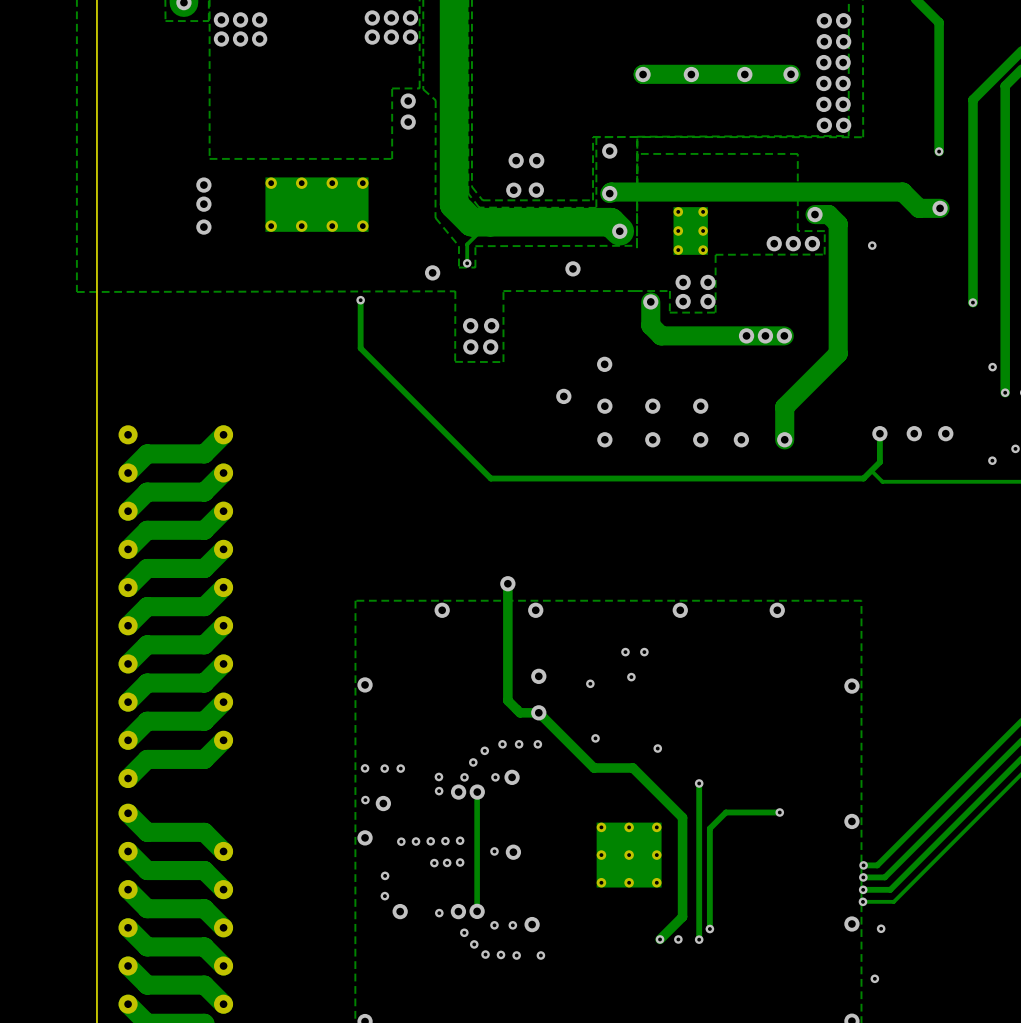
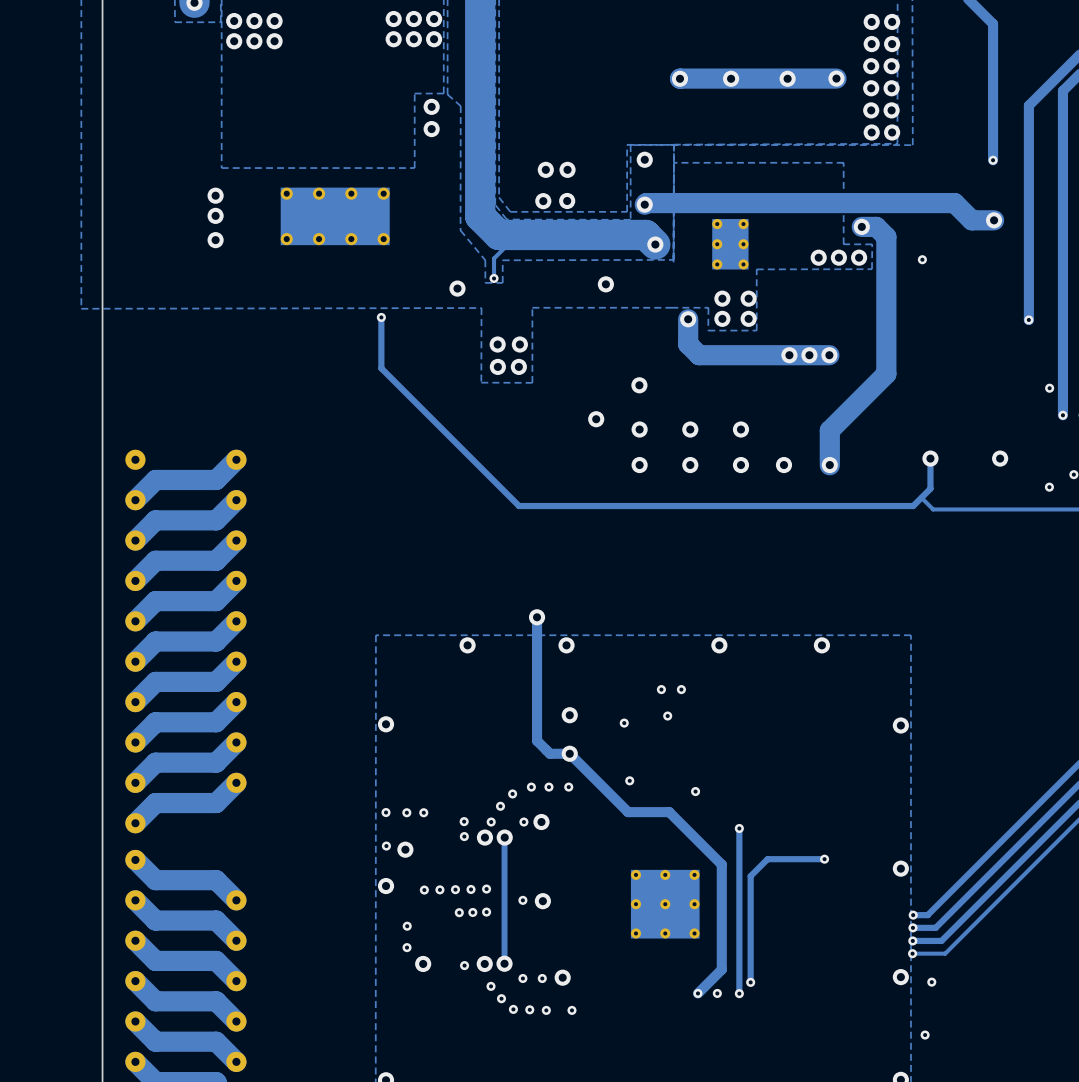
via: (914, 433) -> none

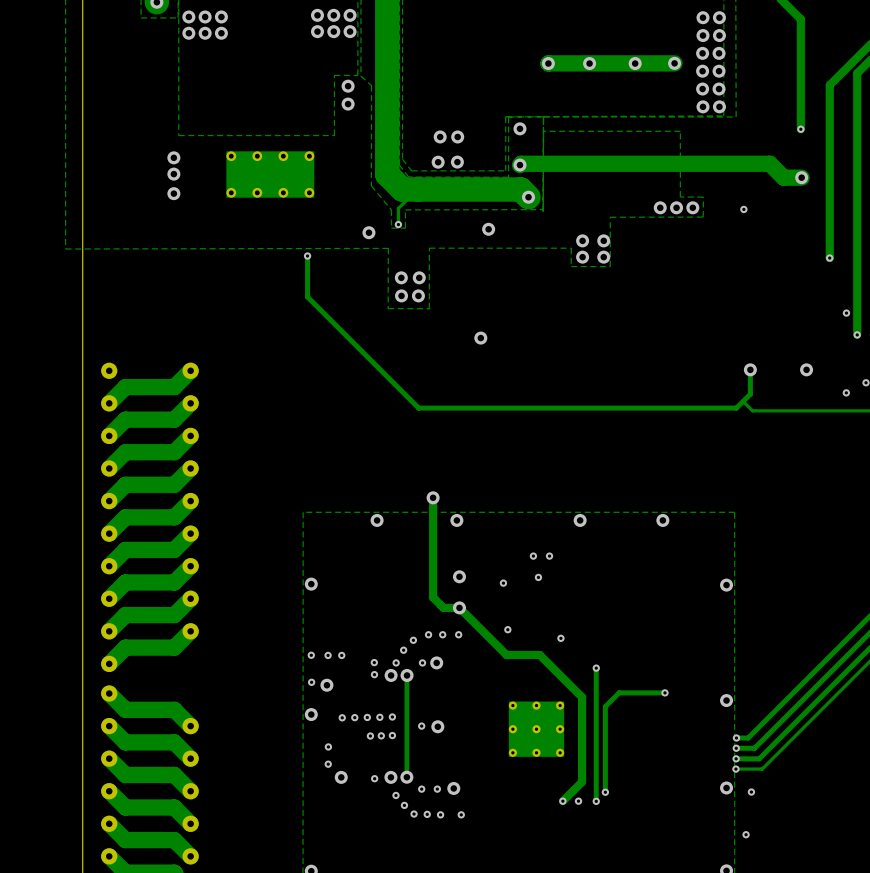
track: (861, 226) (876, 226) (886, 236) (886, 373) (829, 430) (829, 465) -> none
via: (861, 226) -> none
part: (730, 244) -> none
track: (688, 319) (688, 344) (699, 355) (829, 355) -> none
via: (688, 319) -> none
via: (789, 355) -> none
via: (809, 355) -> none
via: (829, 355) -> none
via: (639, 385) -> none
via: (639, 429) -> none
via: (690, 429) -> none
via: (740, 429) -> none
via: (639, 465) -> none
via: (690, 465) -> none
via: (740, 465) -> none
via: (783, 465) -> none
via: (829, 465) -> none

